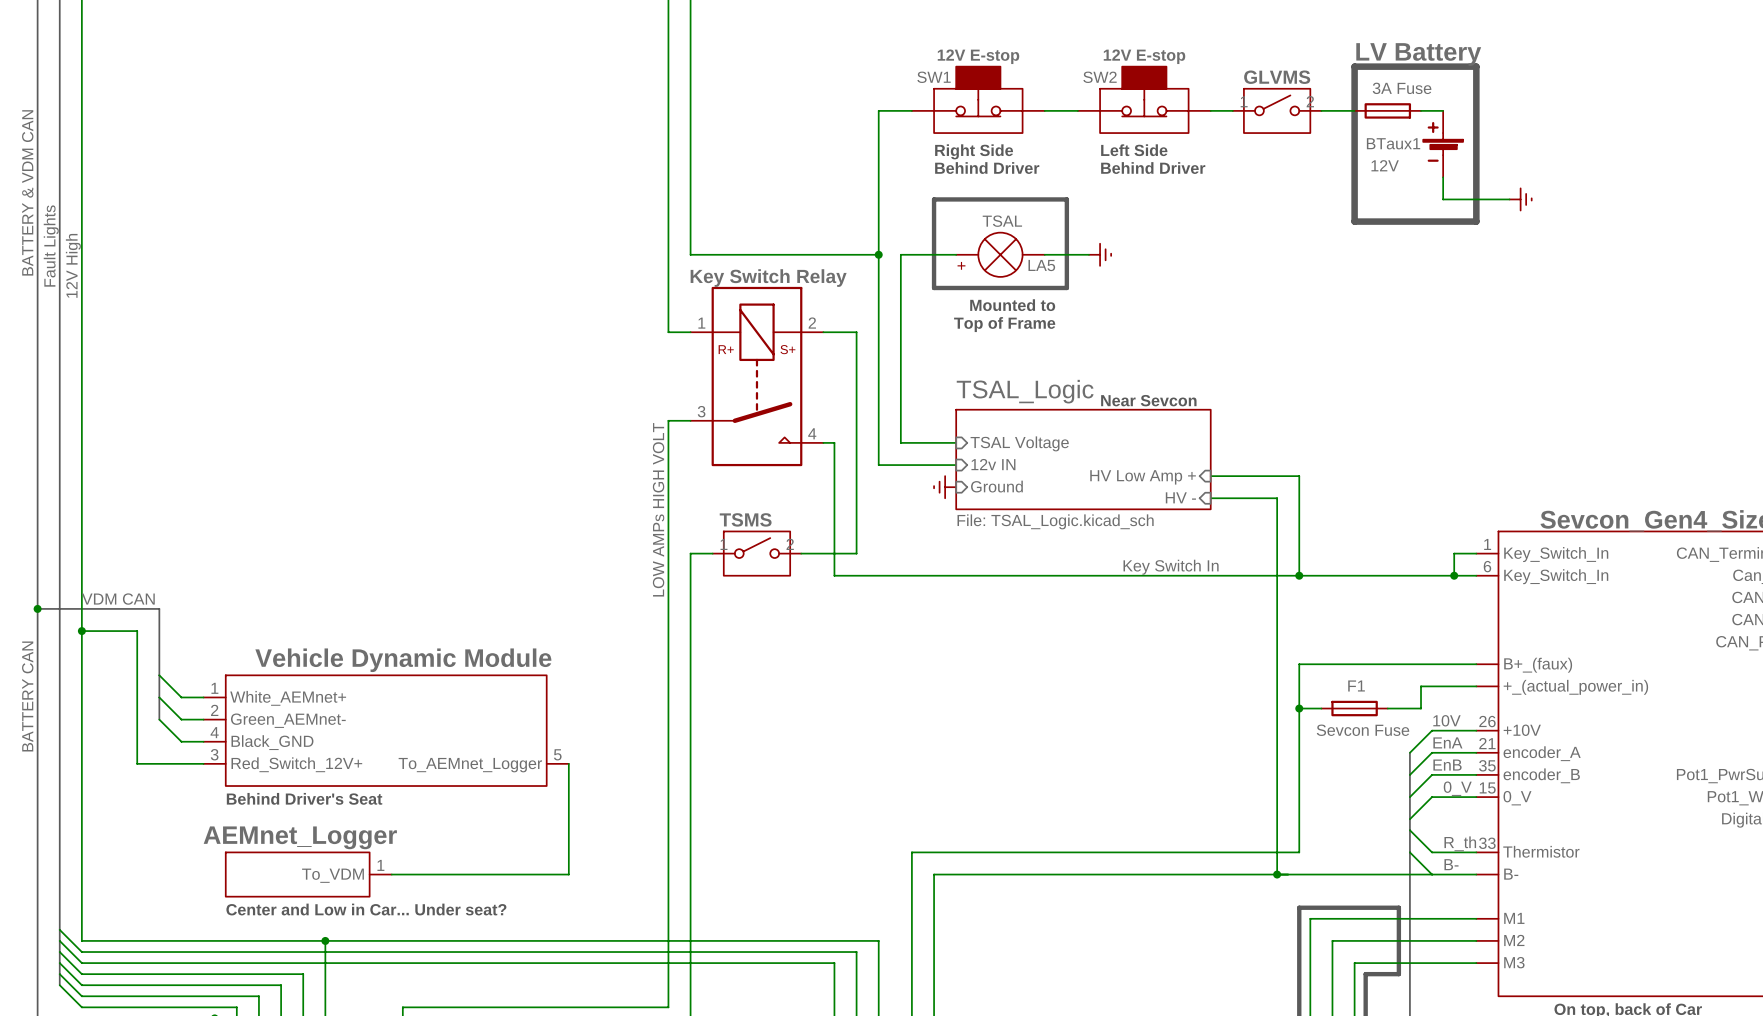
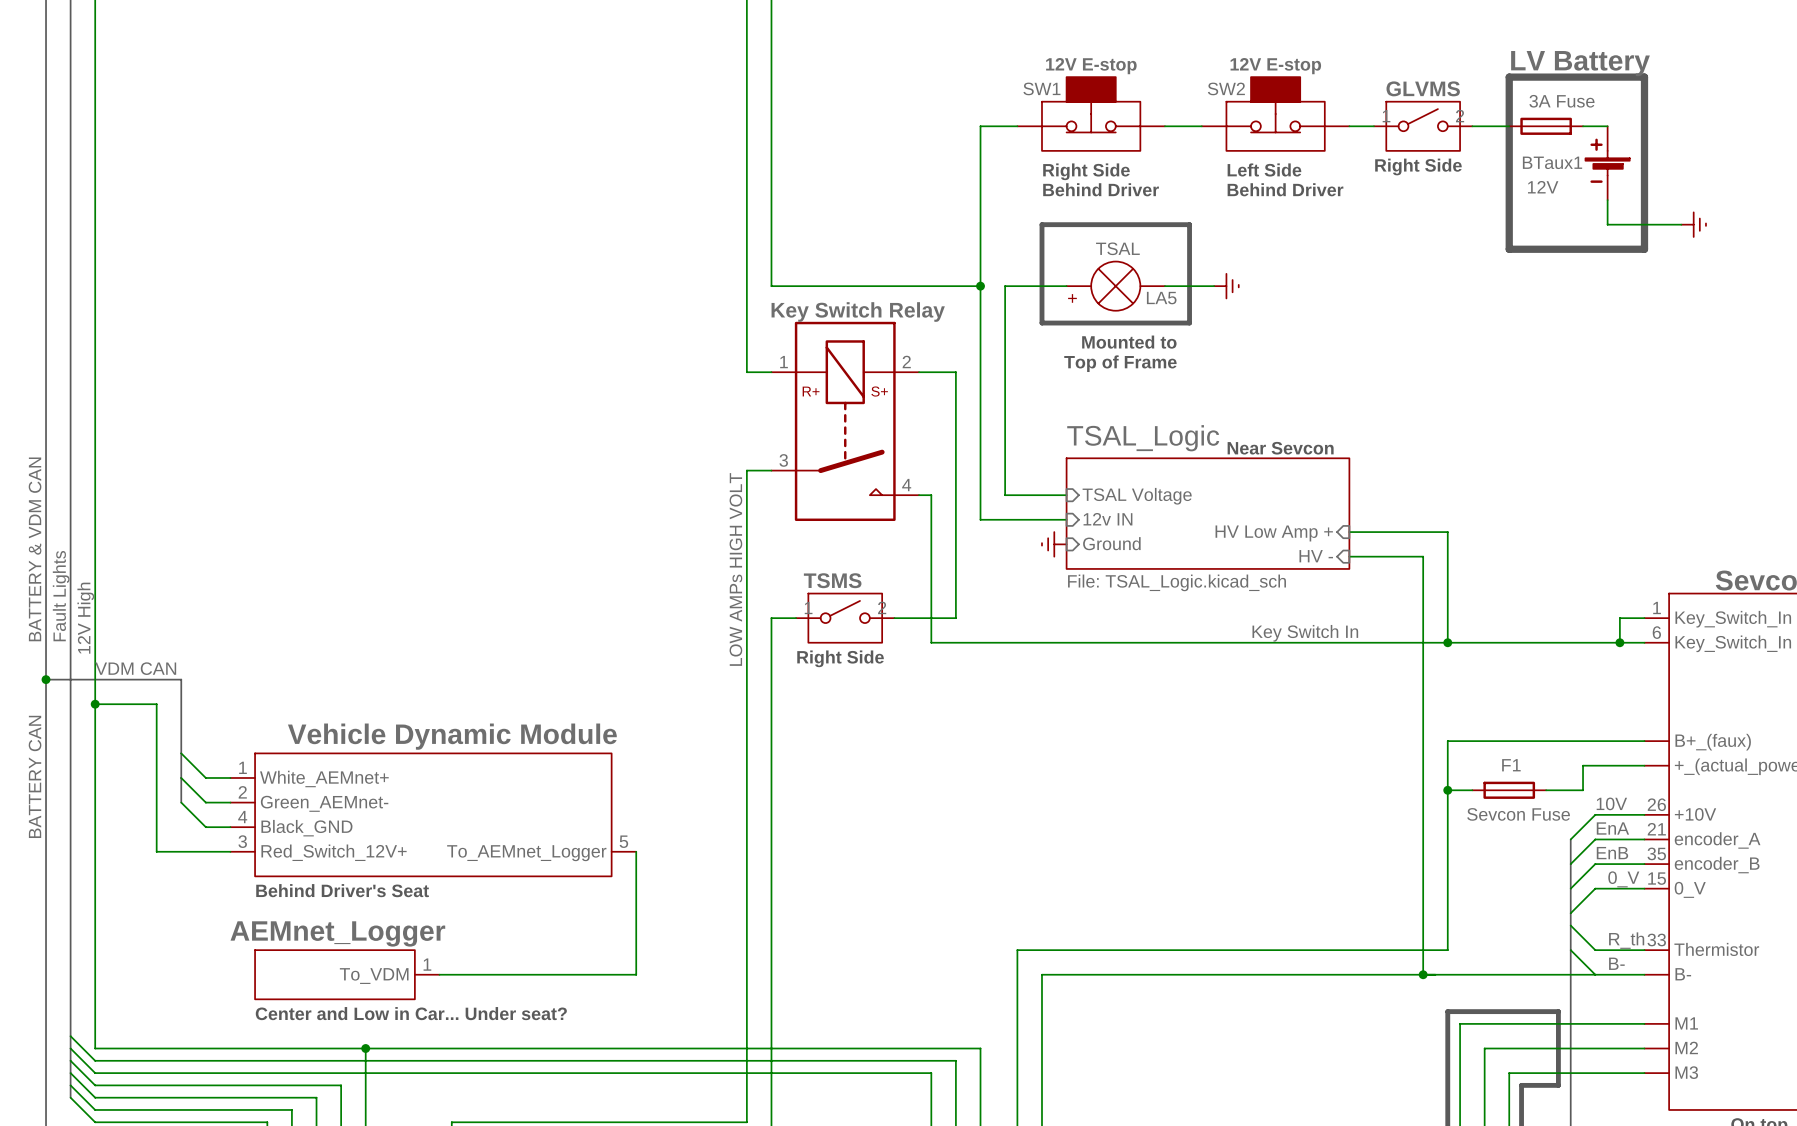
text: none -> Right Side (1418, 166)
label: BATTERY & VDM CAN (27, 192) -> none
label: Fault Lights (51, 246) -> none
label: 12V High (73, 265) -> none
label: none -> BATTERY & VDM CAN (35, 549)
label: none -> Fault Lights (61, 596)
label: none -> 12V High (85, 618)
text: none -> Right Side (840, 658)

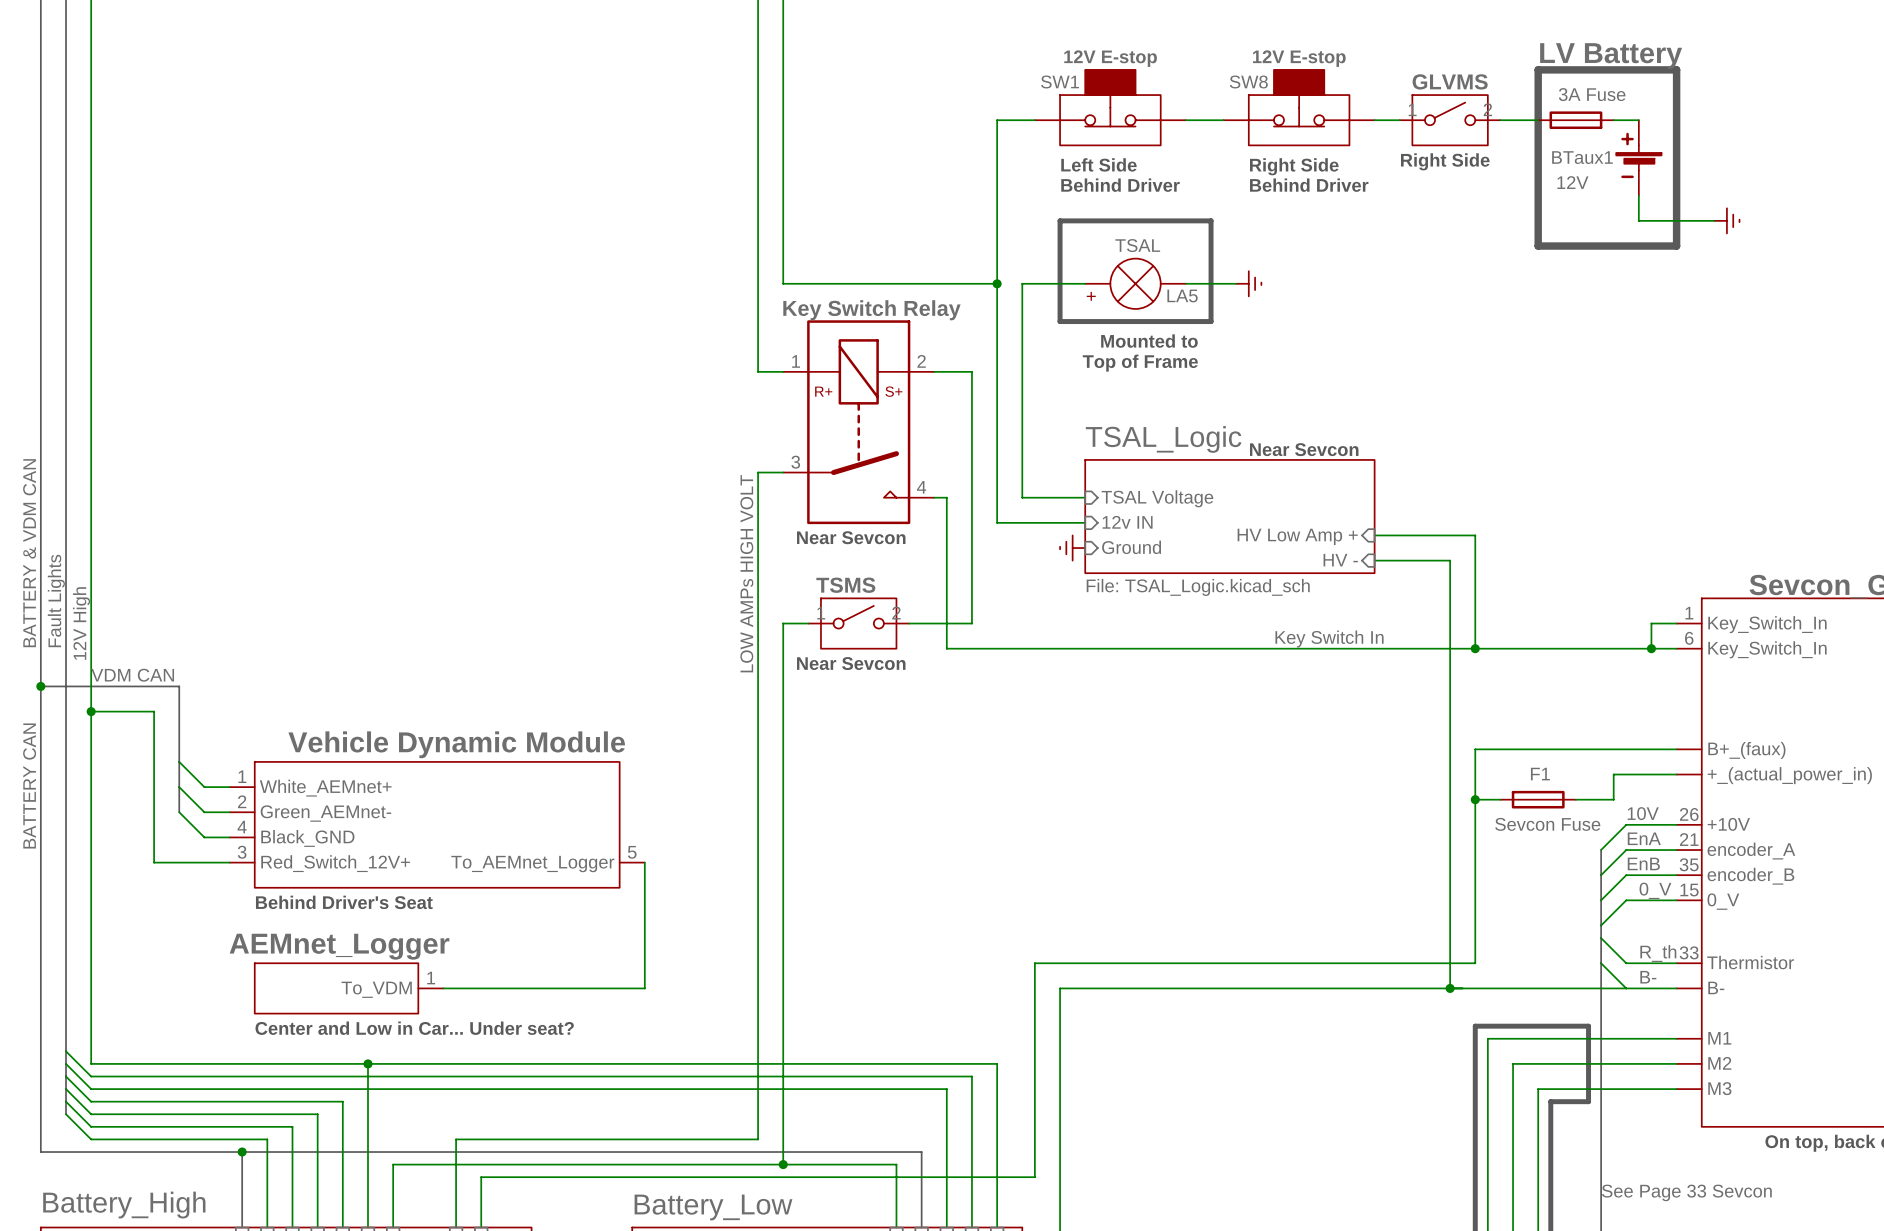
SW2 name: SW2 (1226, 88) -> SW8 (1248, 81)
text: Left Side (1264, 169) -> Right Side (1294, 166)
text: Right Side (1086, 171) -> Left Side (1098, 164)
text: none -> Near Sevcon (851, 537)
text: none -> Near Sevcon (851, 663)
text: Right Side (840, 658) -> none

